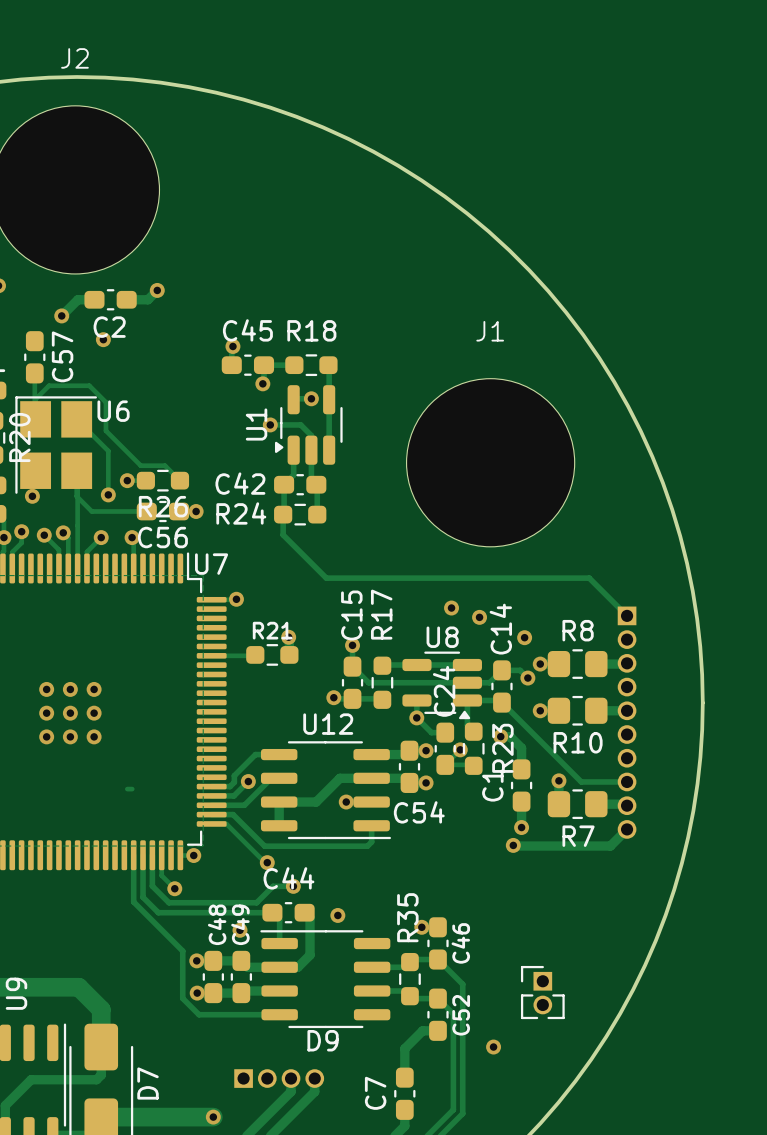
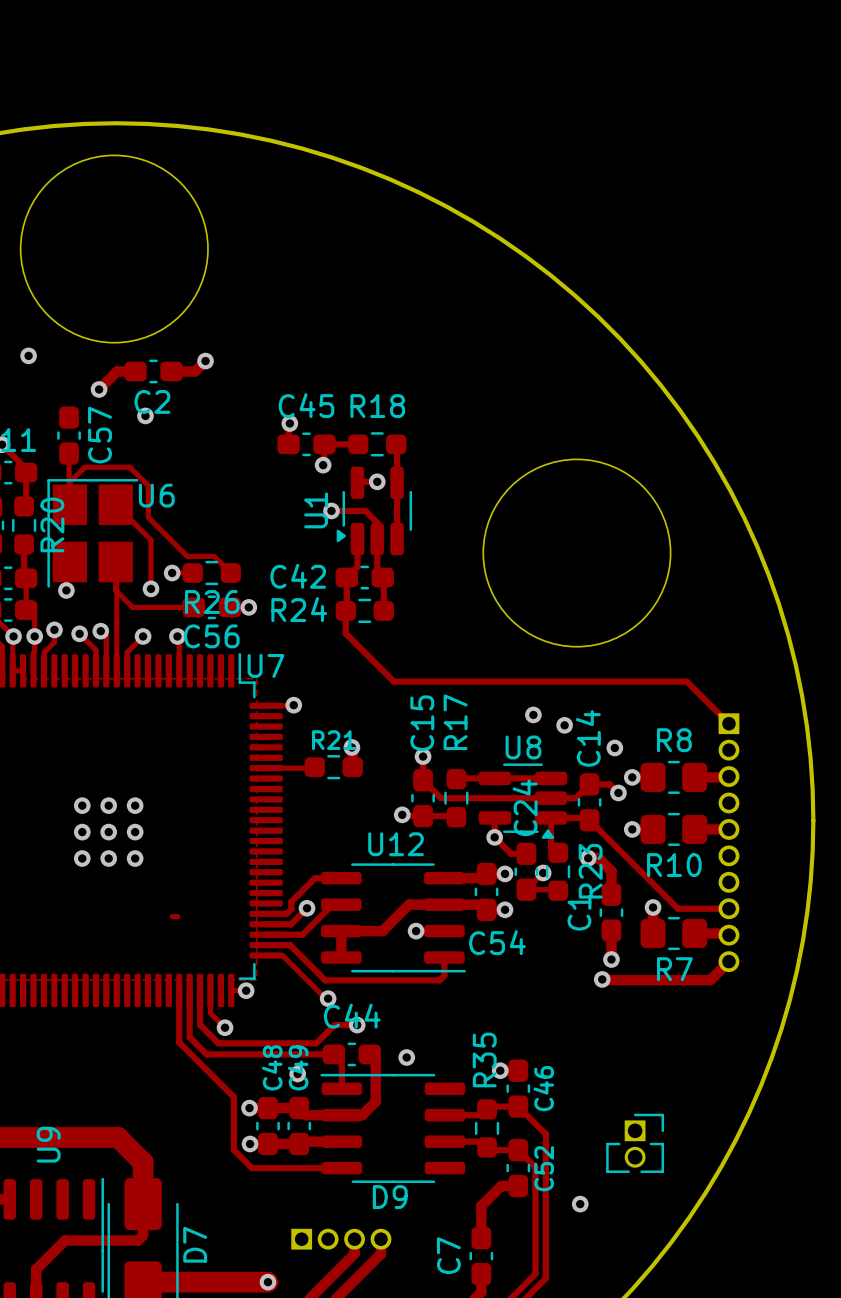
J2 name: J2 (74, 58) -> none
J1 name: J1 (490, 331) -> none
part footprint: [520, 965, 565, 1020] -> [606, 1113, 665, 1173]

